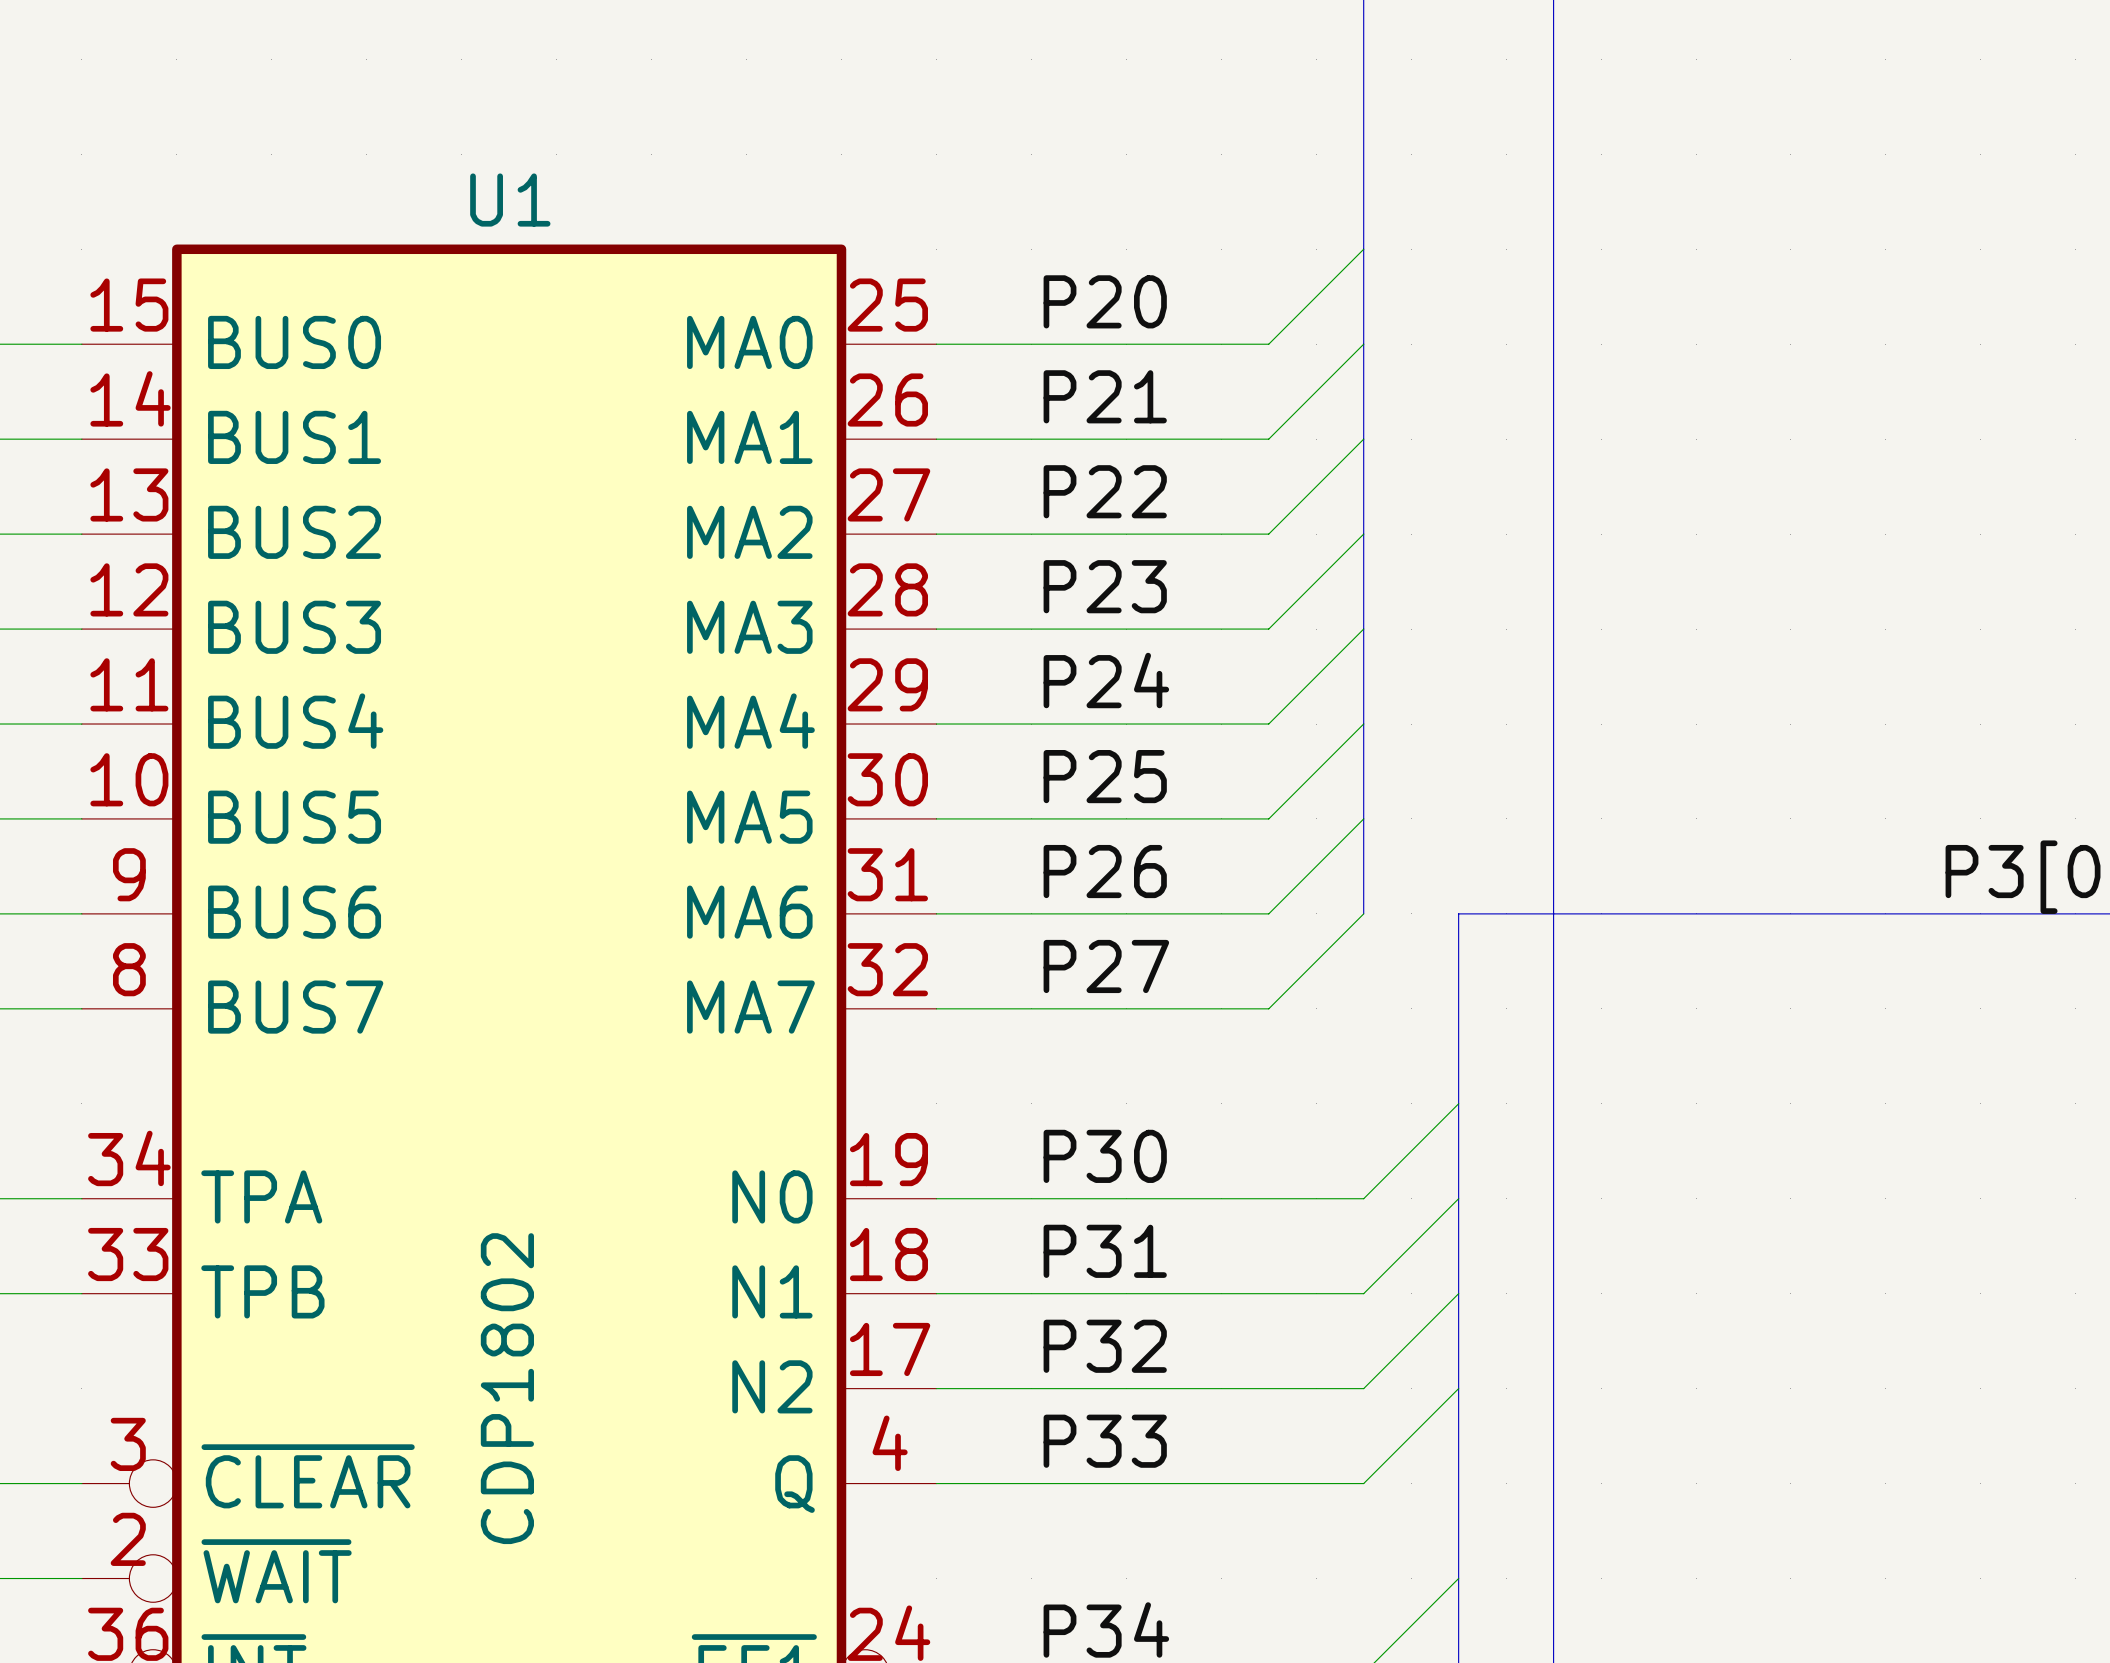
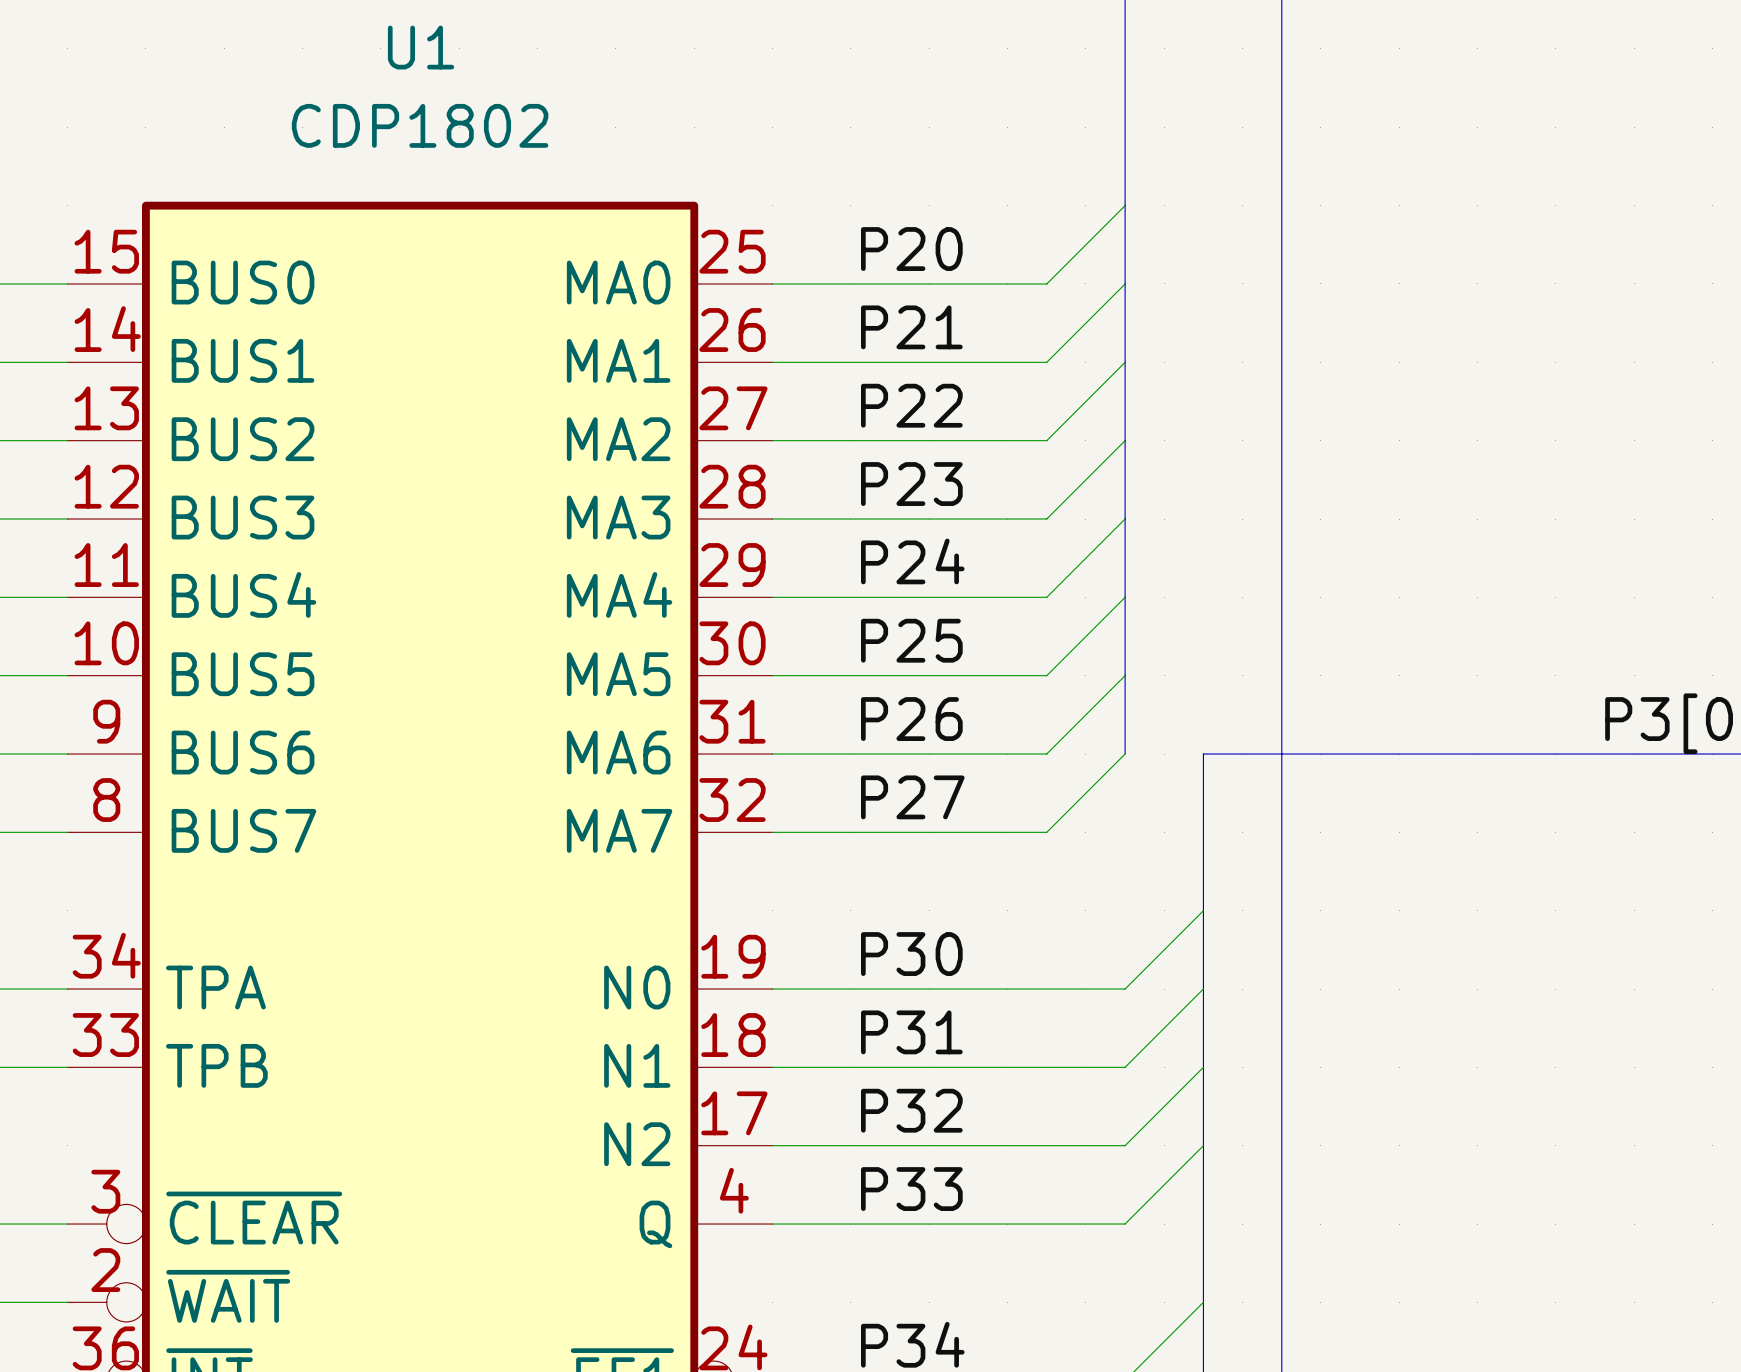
U1 name position: U1 (510, 200) -> U1 (421, 47)
U1 value rotation: 0° (507, 1388) -> 90° clockwise (420, 125)
U1 value position: CDP1802 (507, 1388) -> CDP1802 (420, 125)

